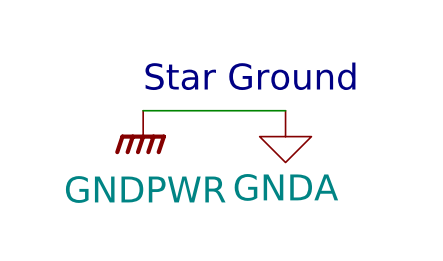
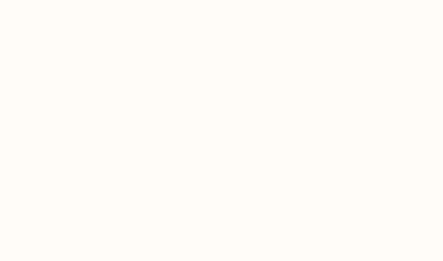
text: Star Ground (250, 76) -> none
wire: (143, 110) (285, 110) -> none
power symbol: GNDPWR (140, 132) -> none
power symbol: GNDA (285, 136) -> none

